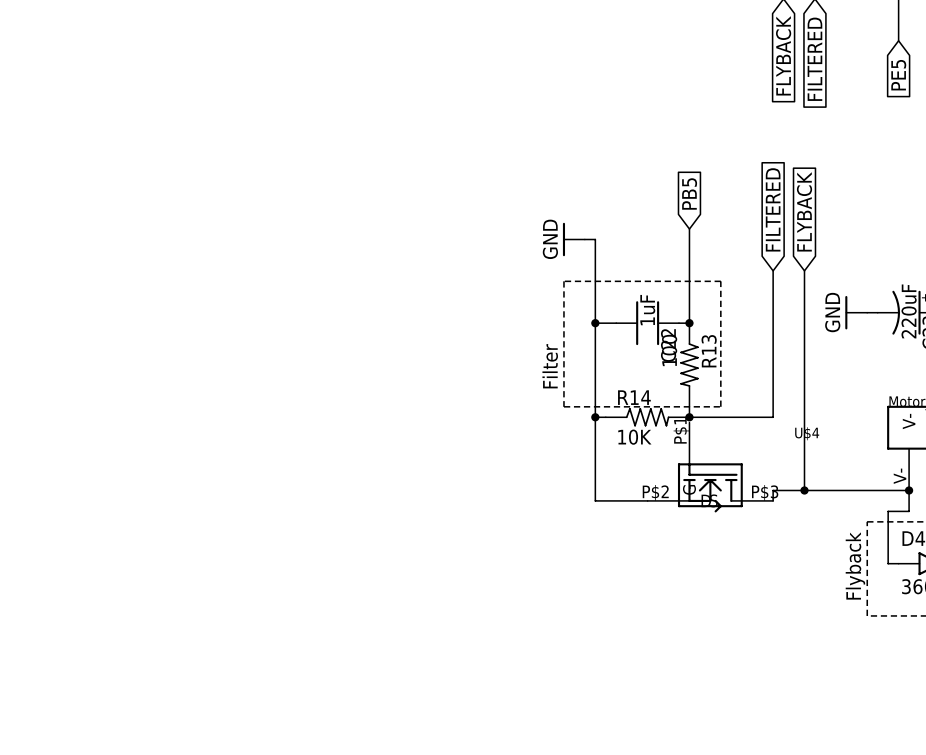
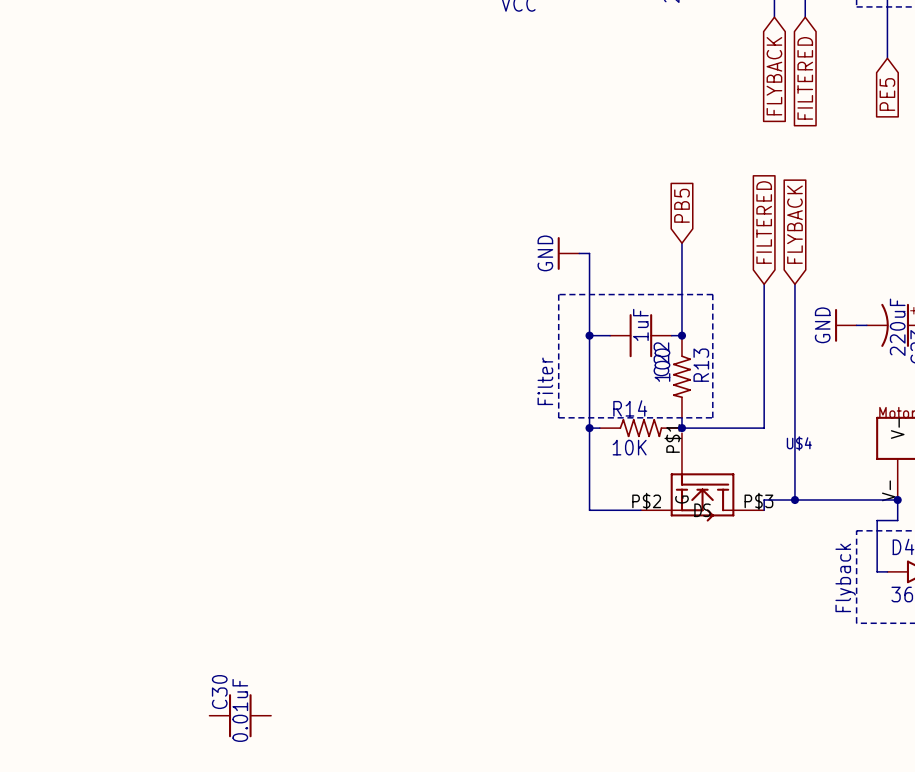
C30: none -> 0.01uF (240, 715)

